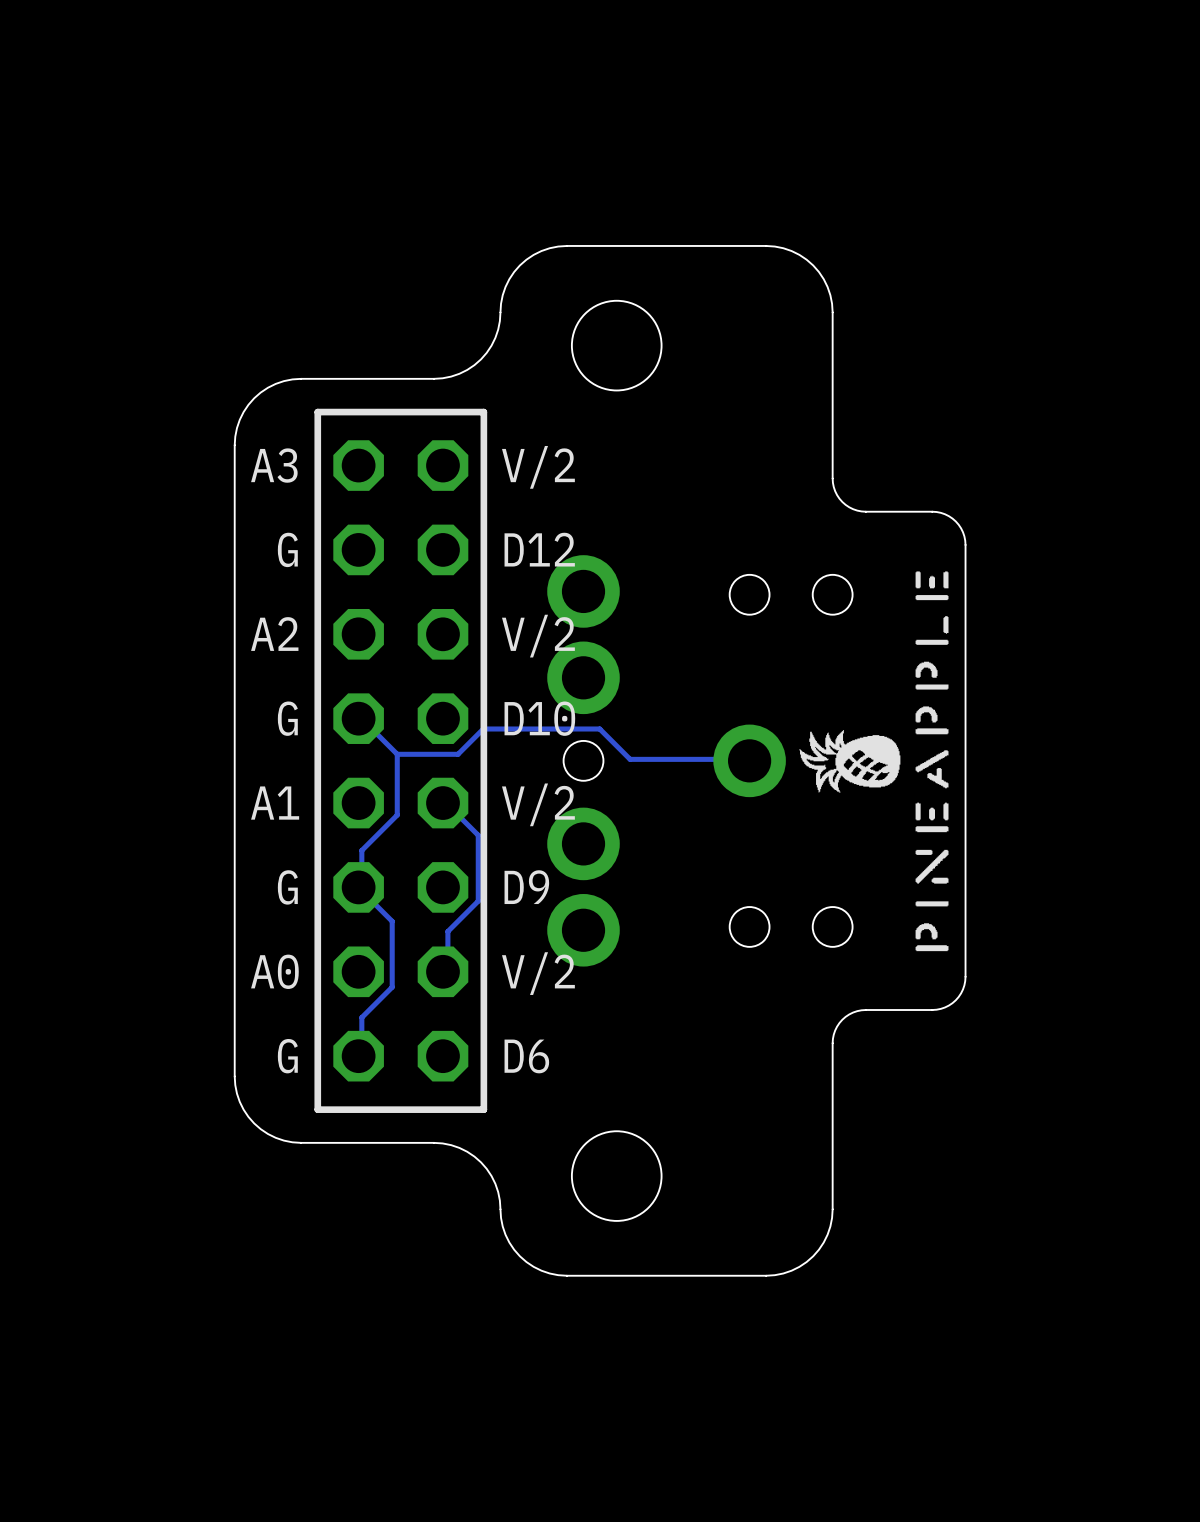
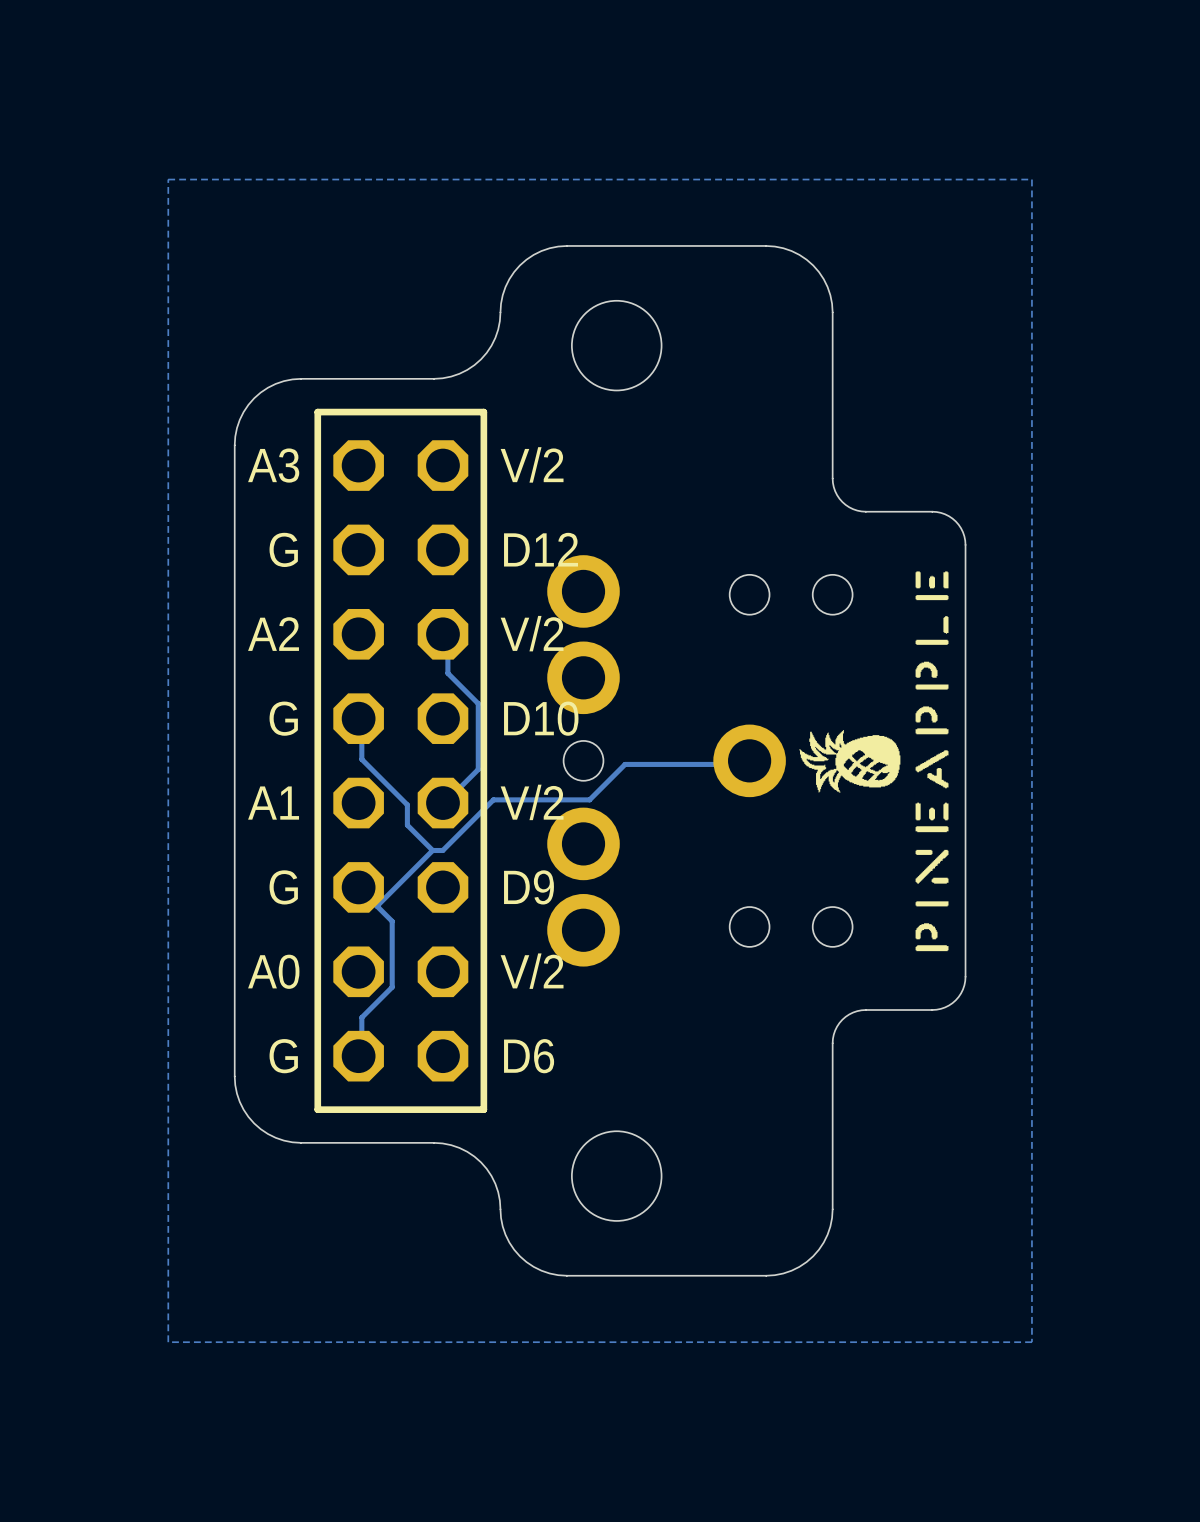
zone outline: none -> (1031, 179) (168, 179) (168, 1342) (1031, 1342) (1031, 179)
track: (361, 718) (397, 754) -> (361, 718) (361, 759) (407, 804) (407, 825) (432, 850)
track: (397, 754) (458, 754) (483, 729) (599, 729) (630, 759) (749, 760) -> (432, 850) (442, 850) (493, 799) (589, 799) (625, 764) (746, 764) (749, 760)
track: (397, 754) (397, 815) (361, 850) (361, 885) (358, 887) -> none
track: (443, 803) (447, 804) (478, 835) (478, 901) (447, 931) (447, 966) (443, 971) -> (443, 803) (478, 769) (478, 703) (447, 673) (447, 637) (443, 634)
track: none -> (432, 850) (377, 906)

